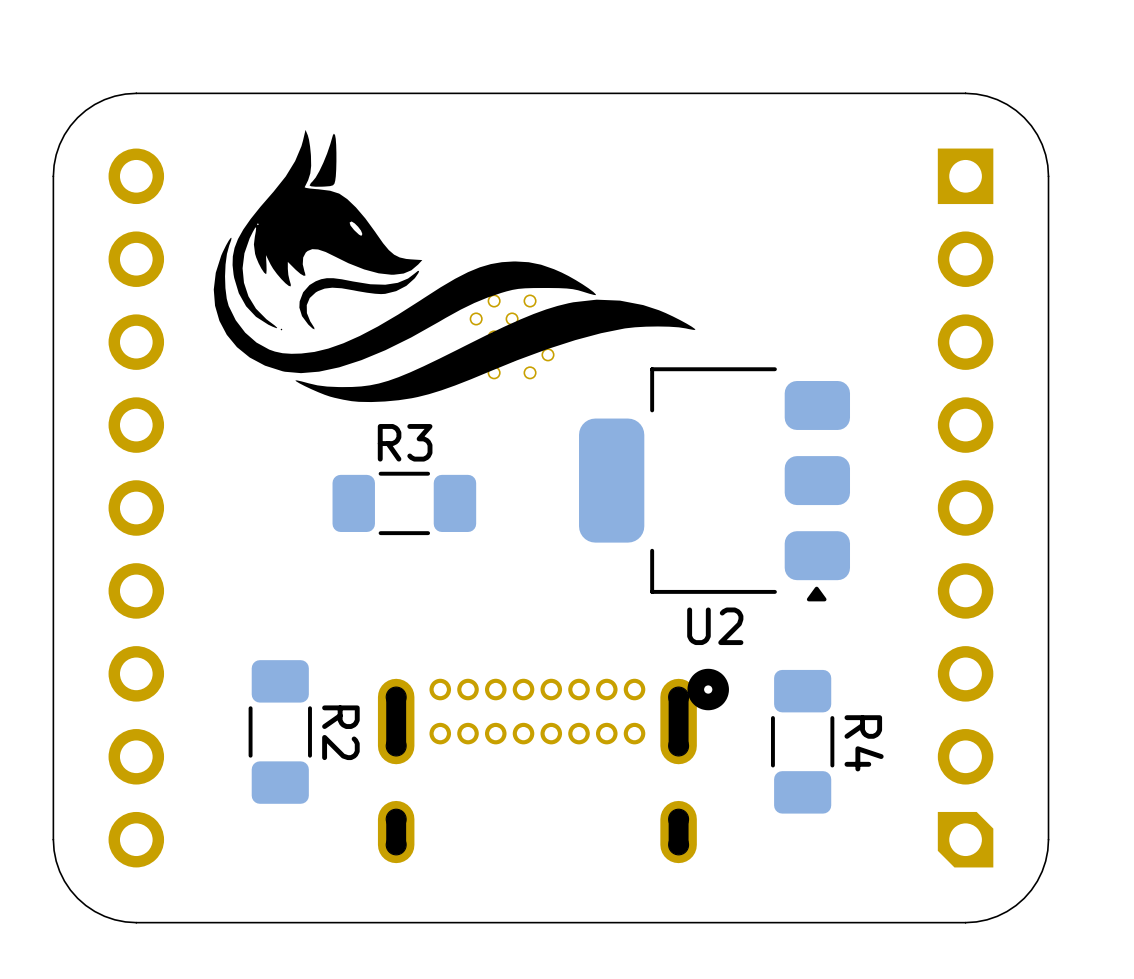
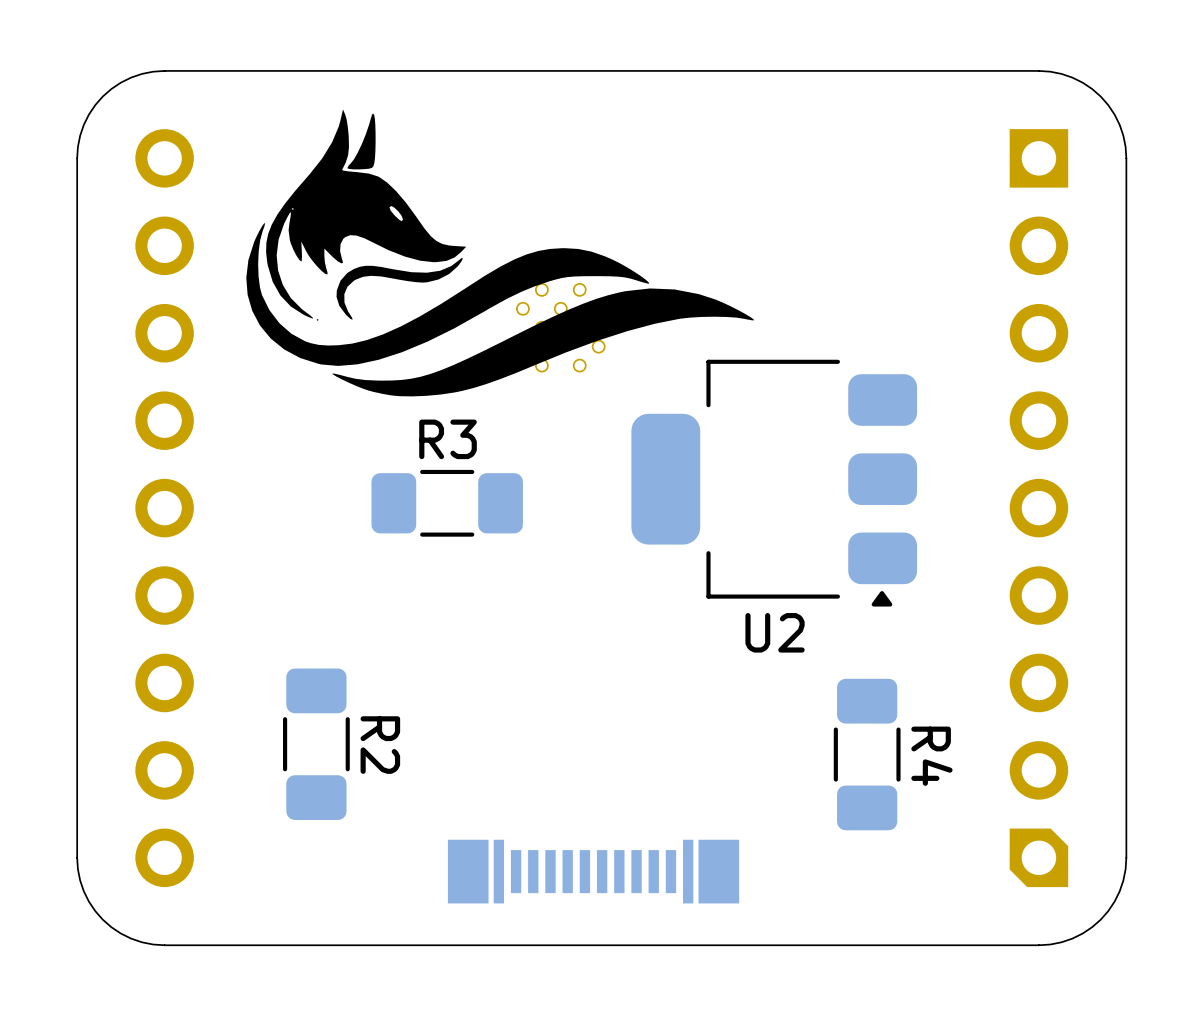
part: (553, 765) -> none
part: none -> (593, 871)

